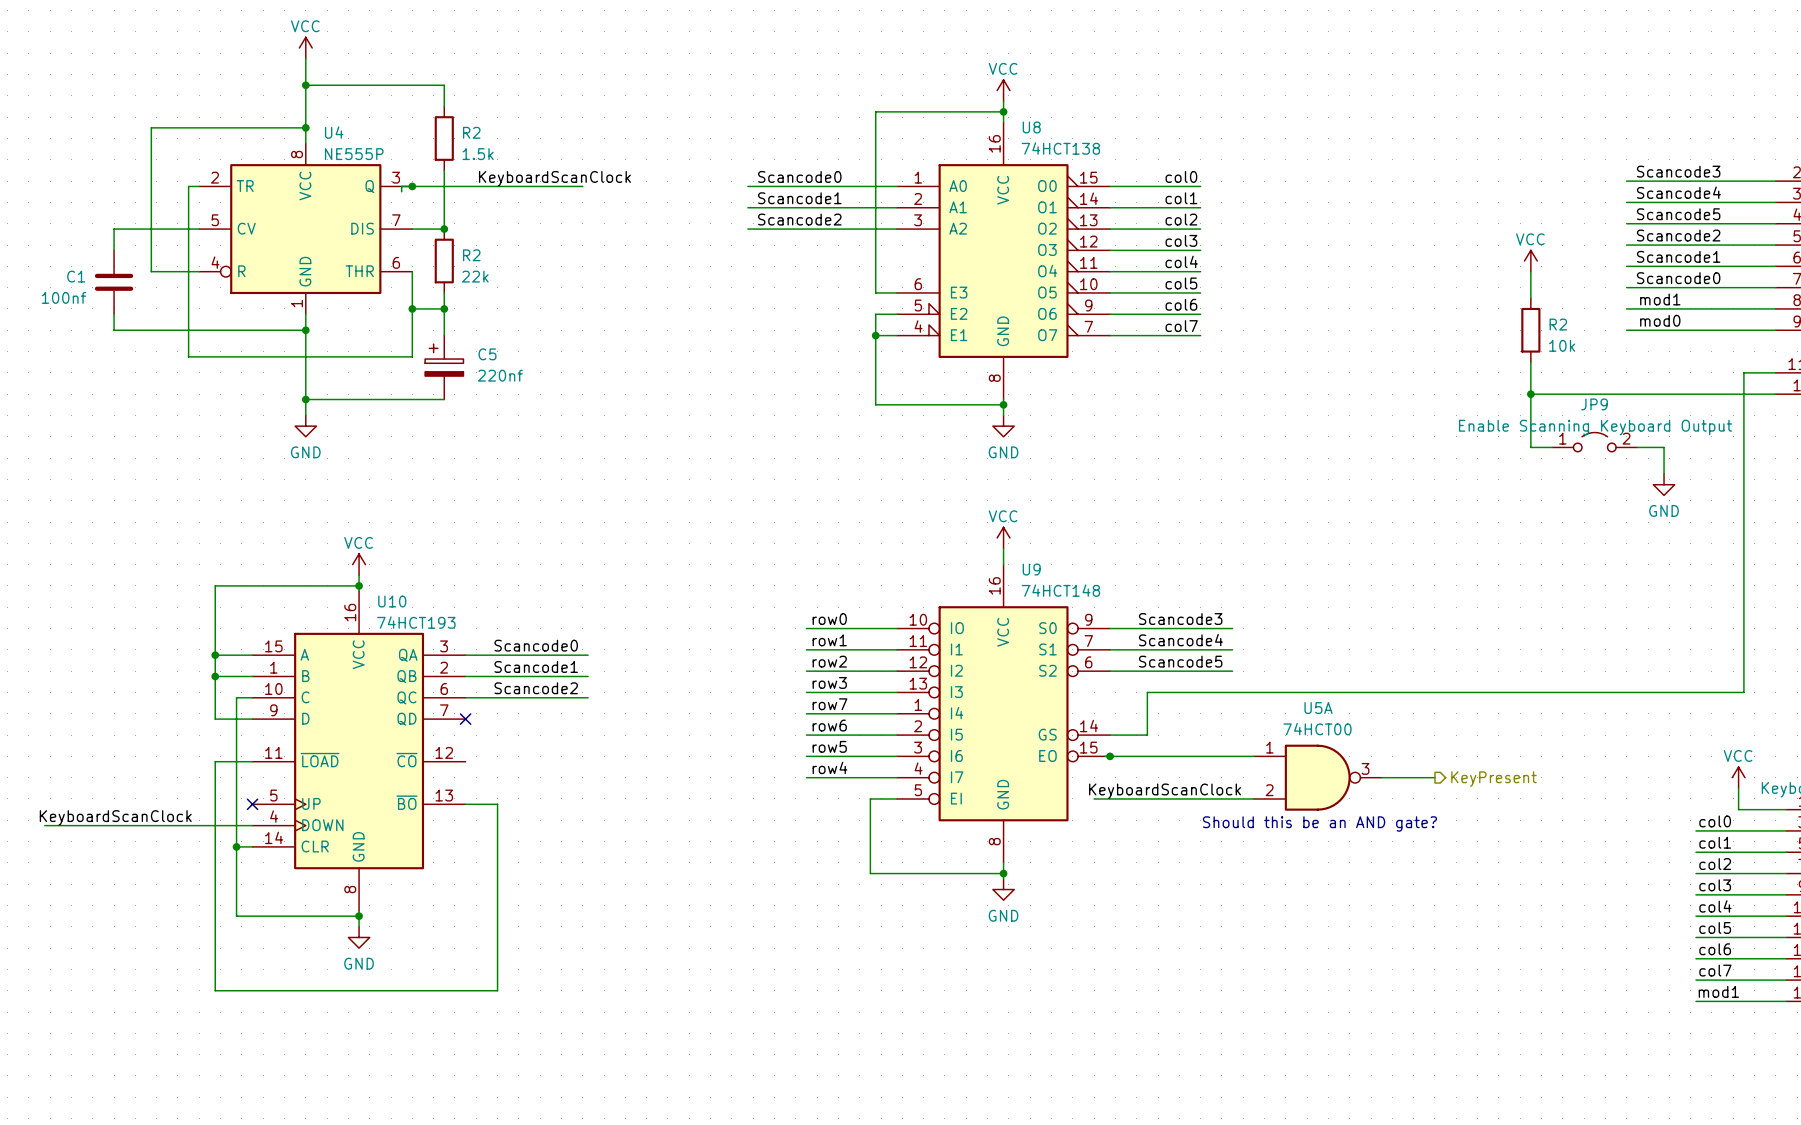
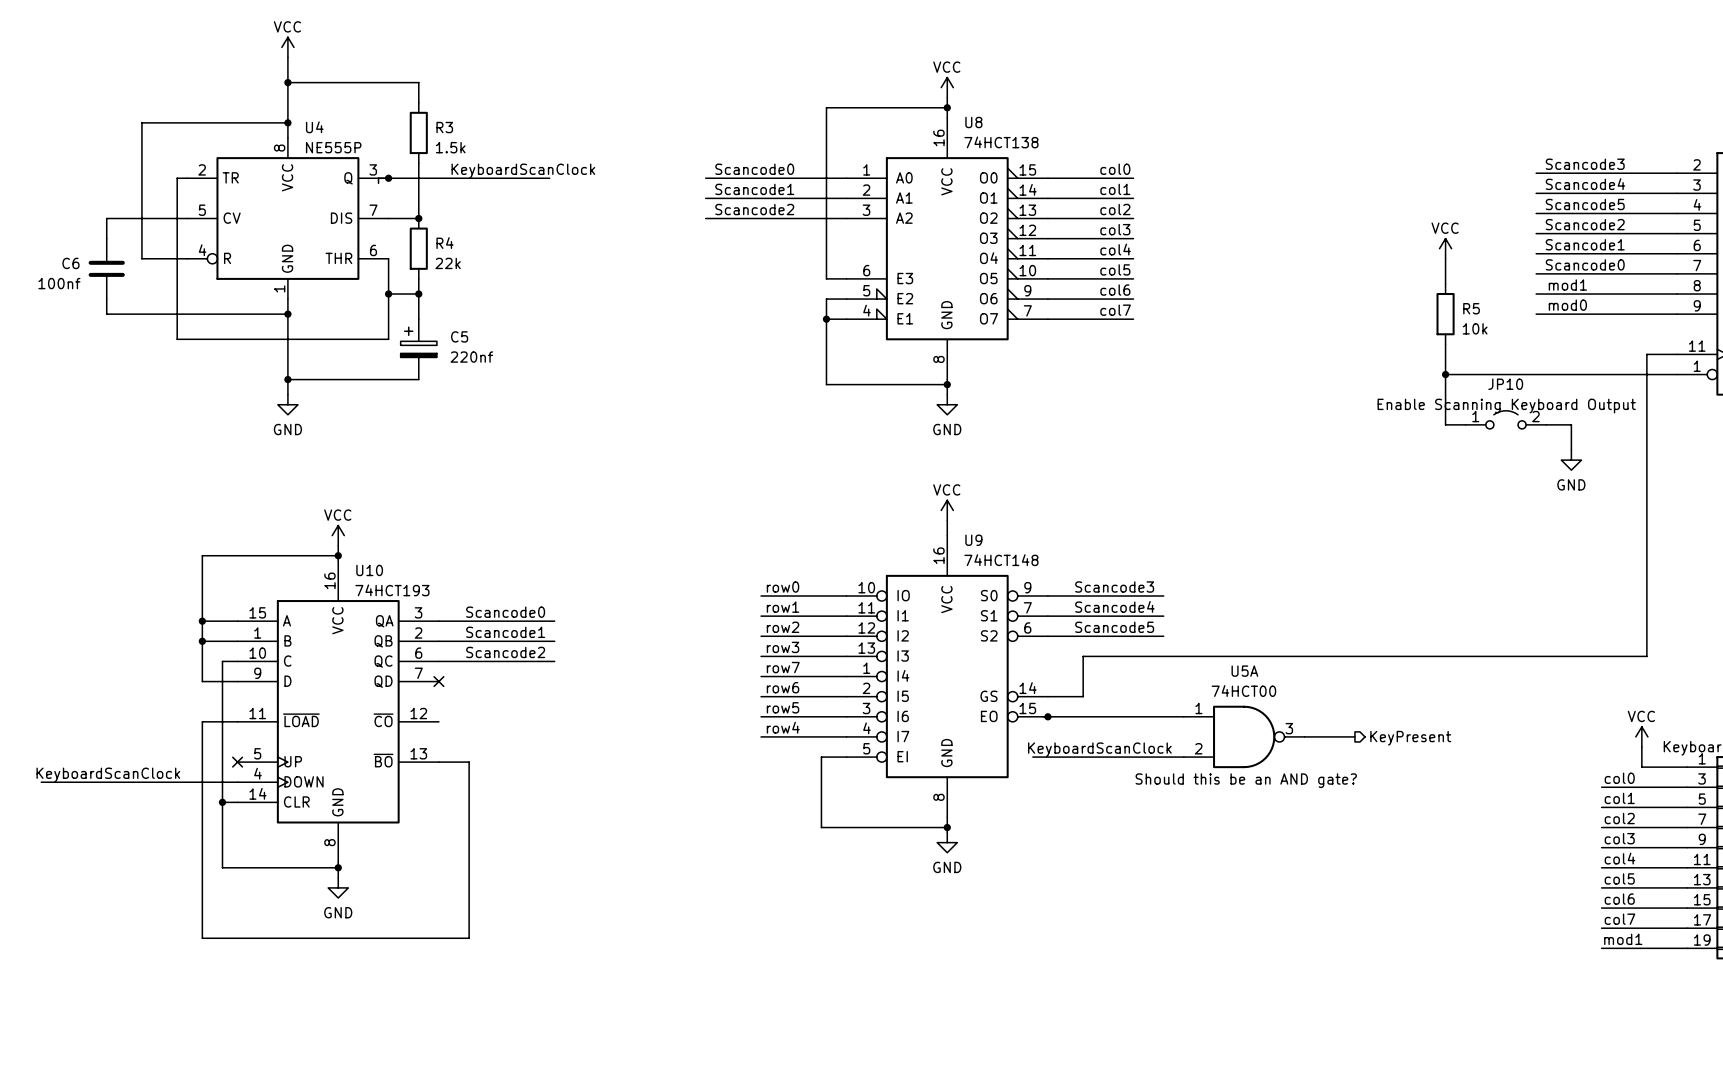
R2 name: R2 (471, 132) -> R3 (444, 127)
R2 name: R2 (471, 255) -> R4 (444, 243)
C1 name: C1 (76, 276) -> C6 (70, 263)
R2 name: R2 (1558, 324) -> R5 (1471, 308)
JP9 name: JP9 (1594, 404) -> JP10 (1505, 384)

